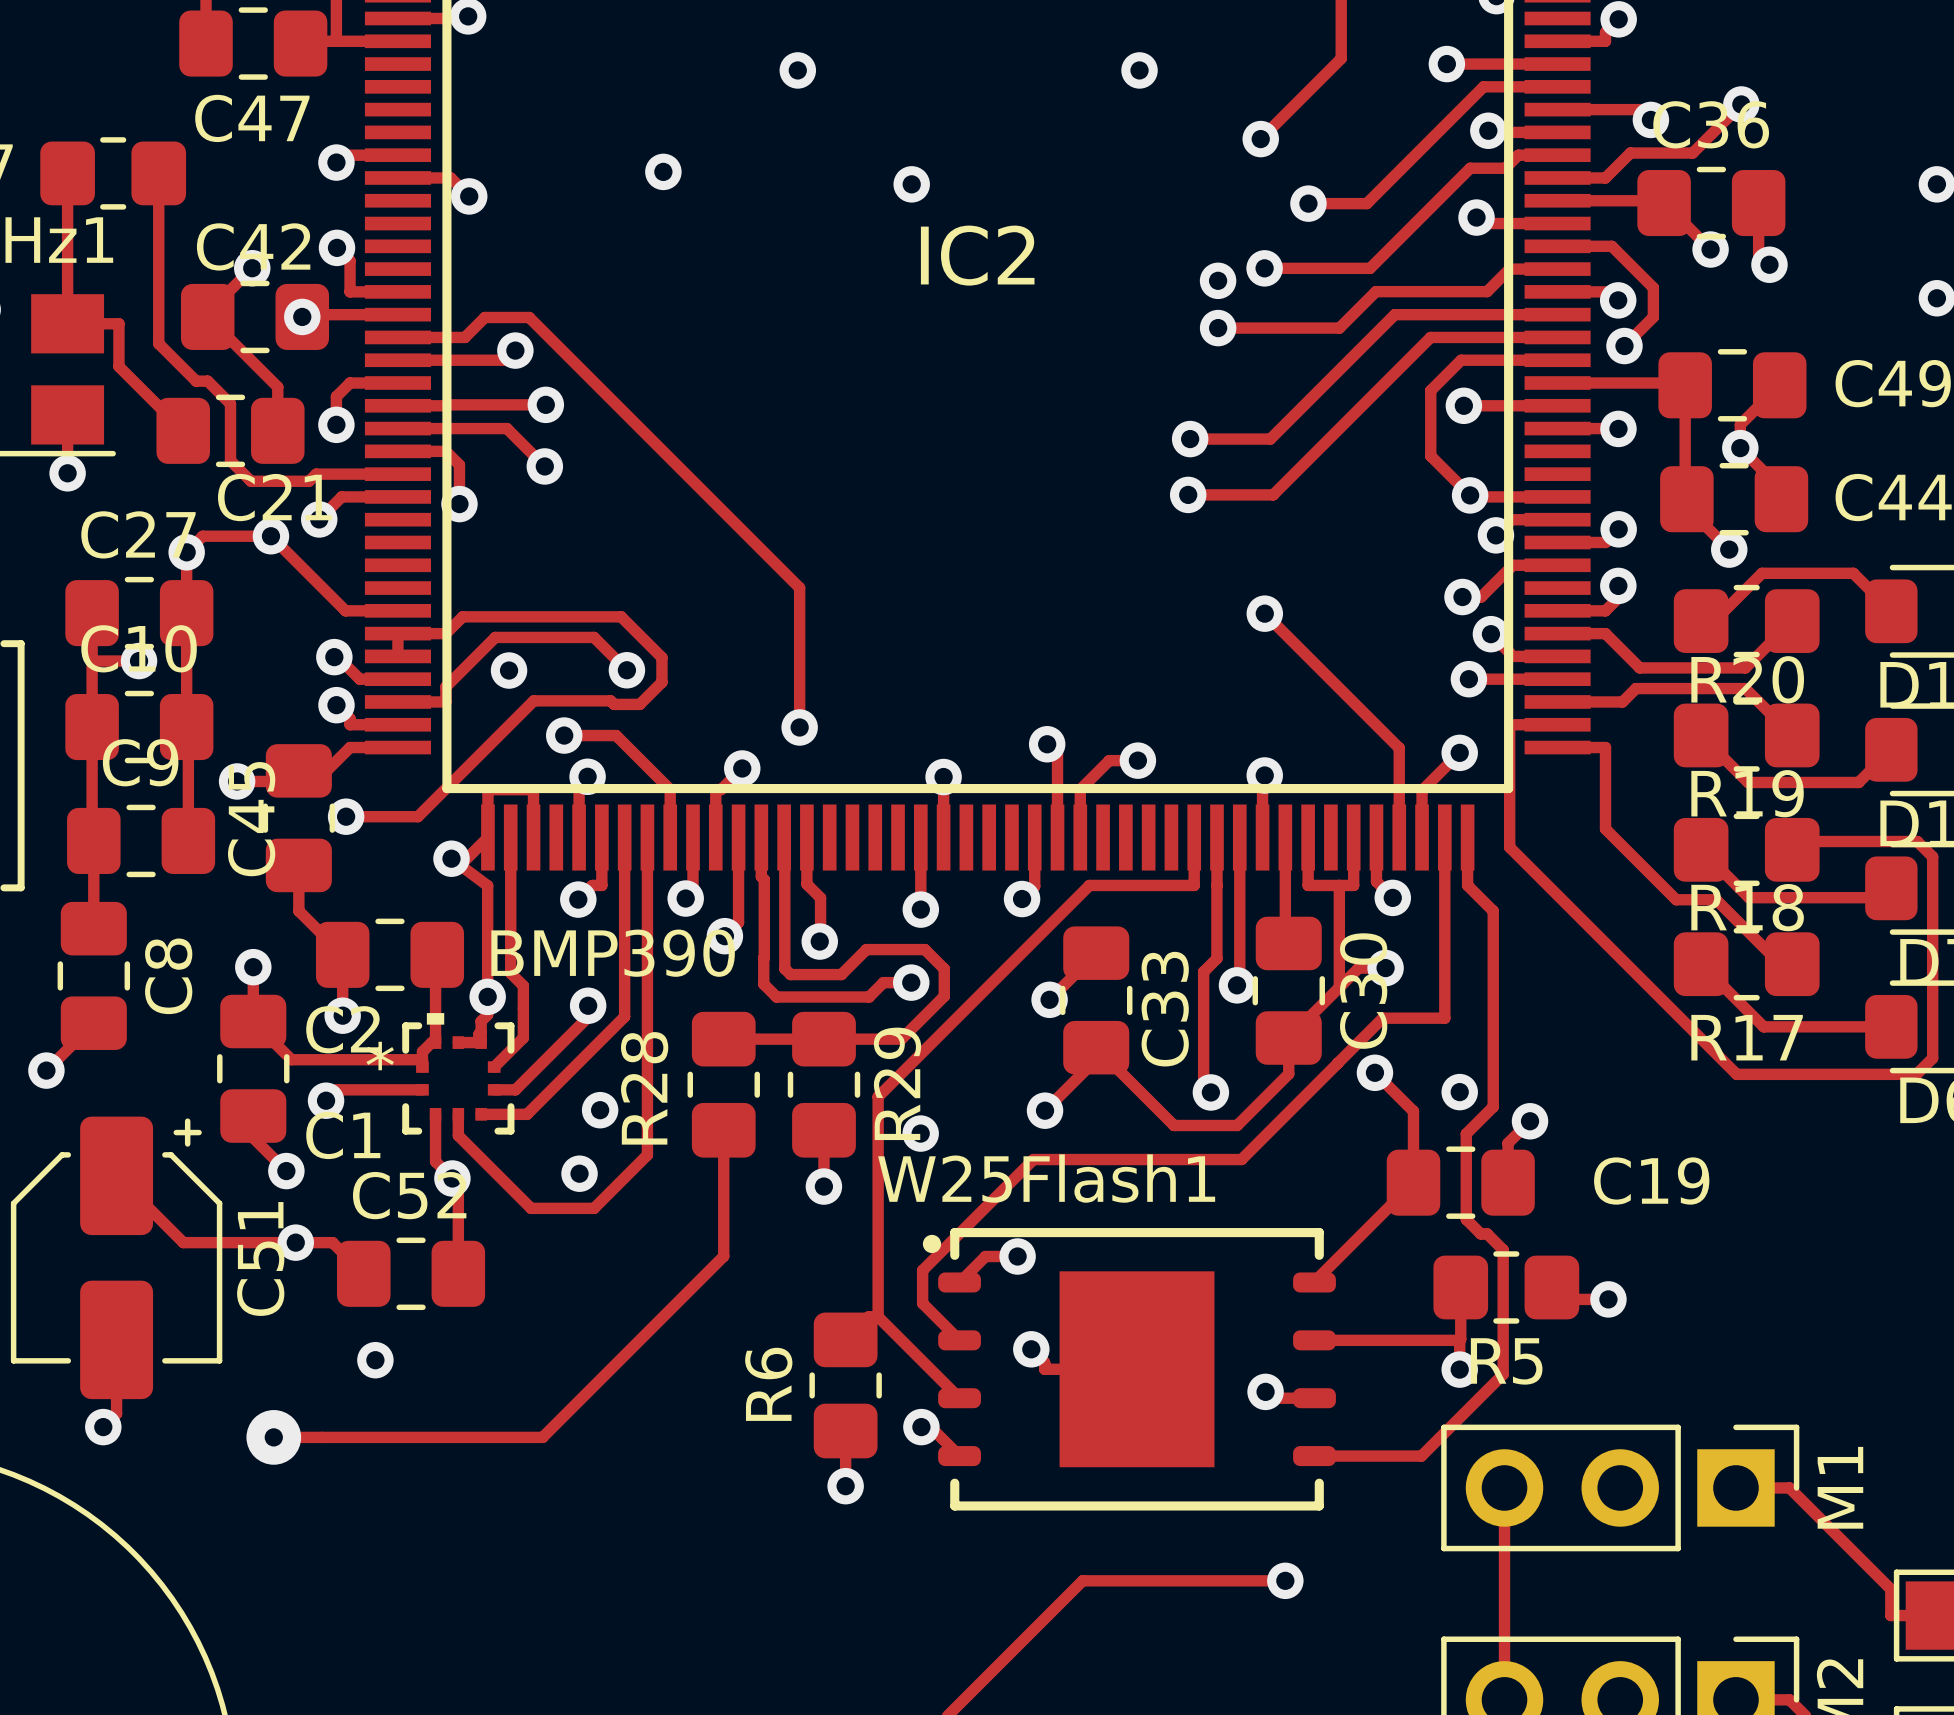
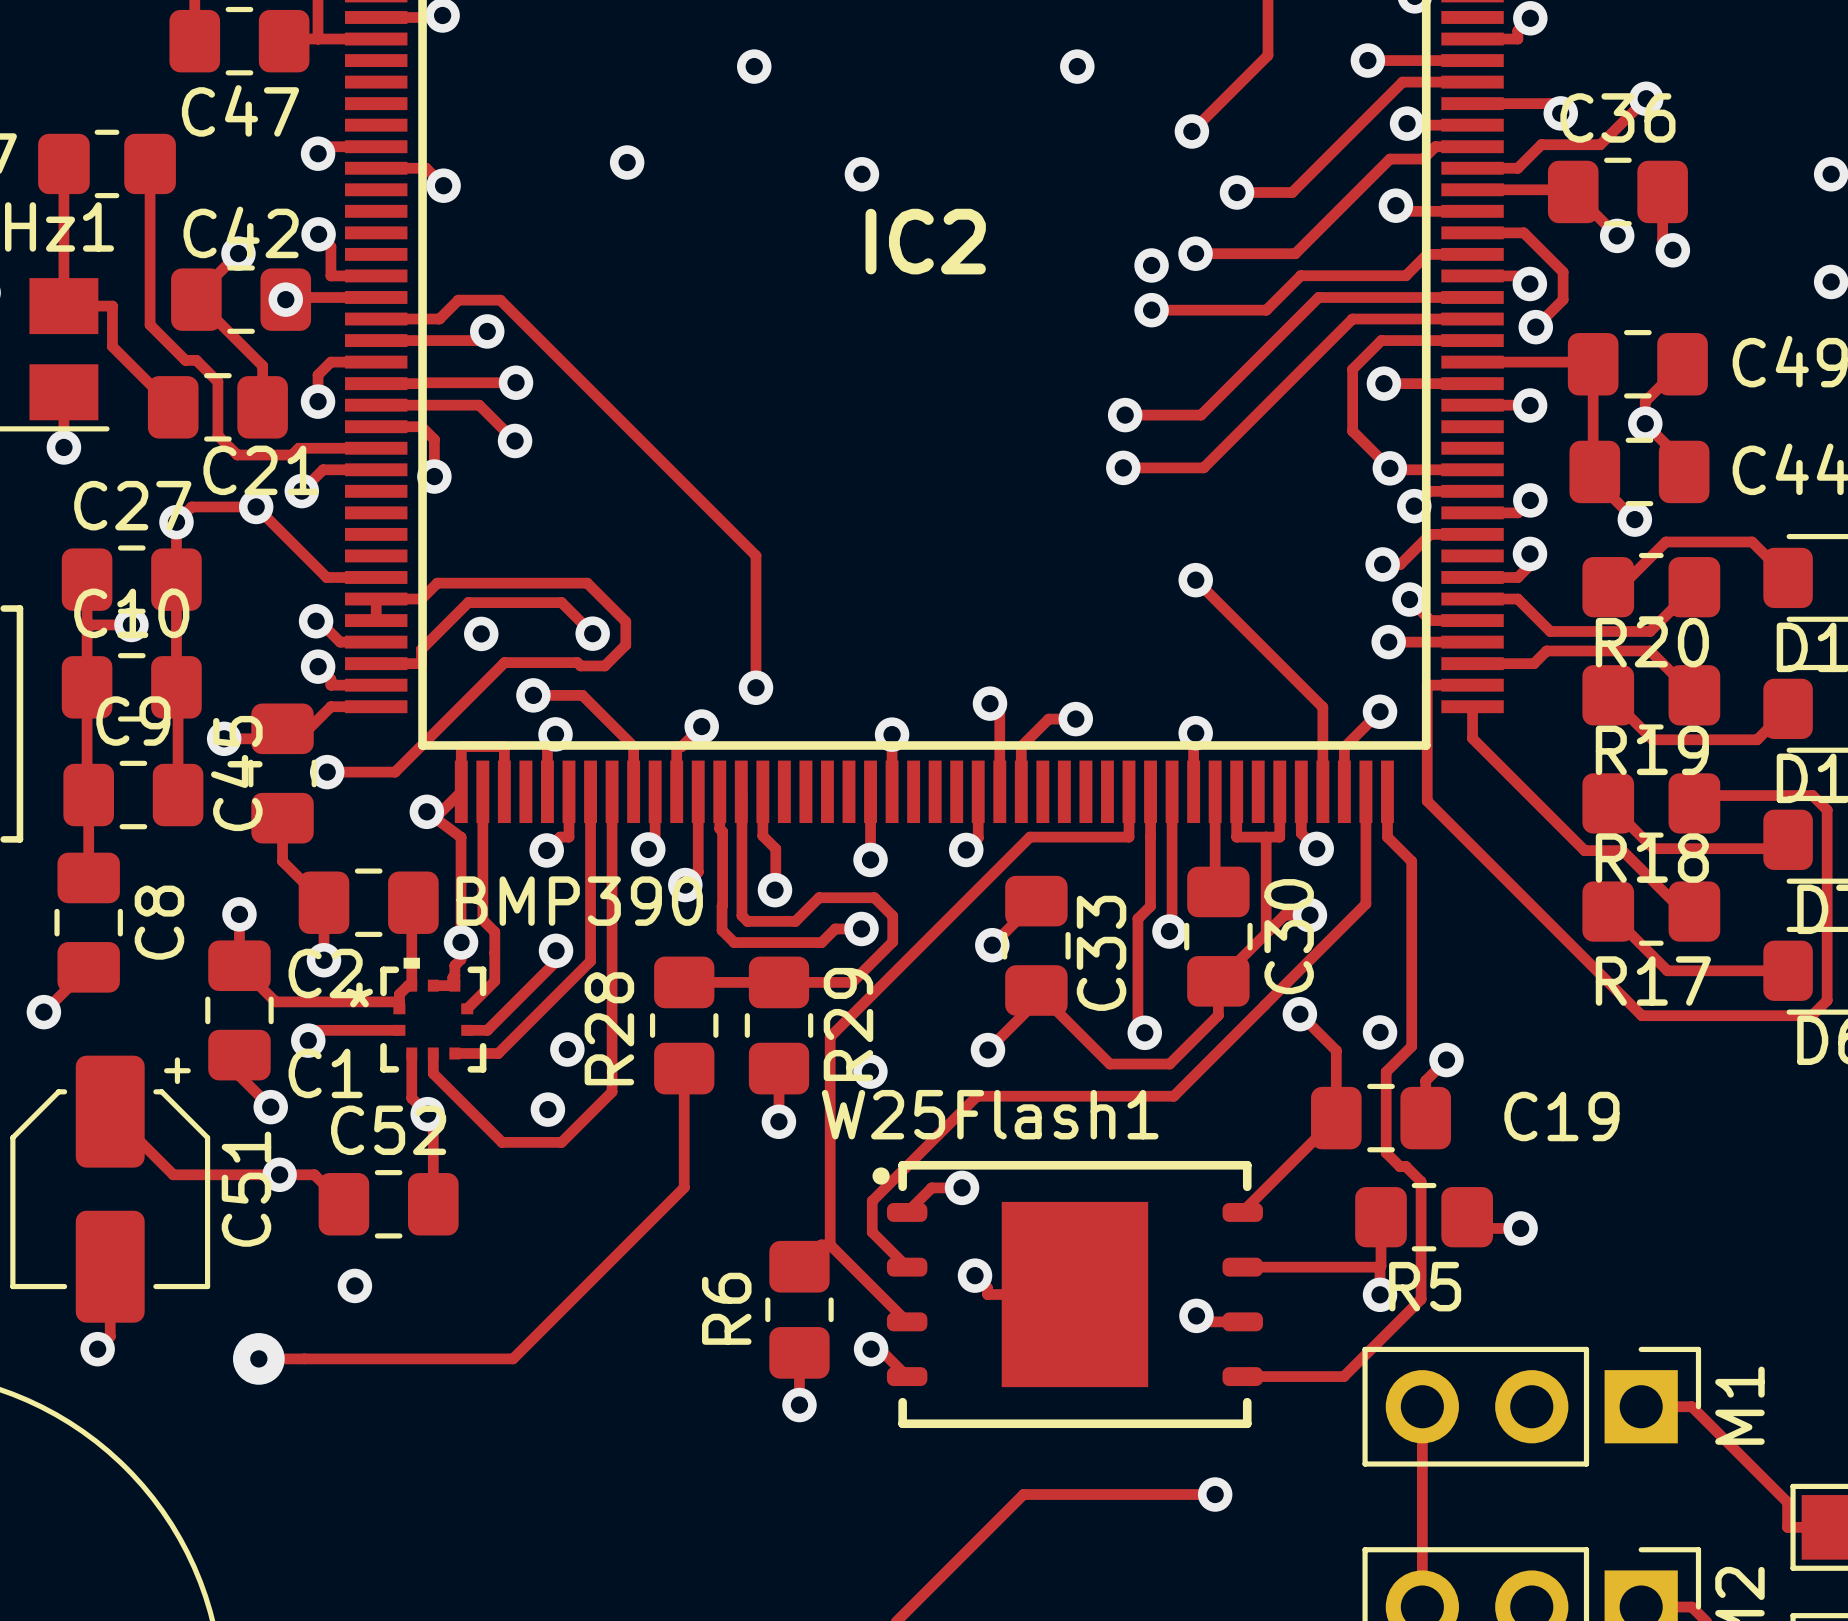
track: (1557, 747) (1605, 747) (1605, 829) -> (1472, 706) (1472, 738) (1517, 783)
track: (1444, 956) (1444, 1018) (1382, 1018) -> (1365, 903) (1307, 962)

